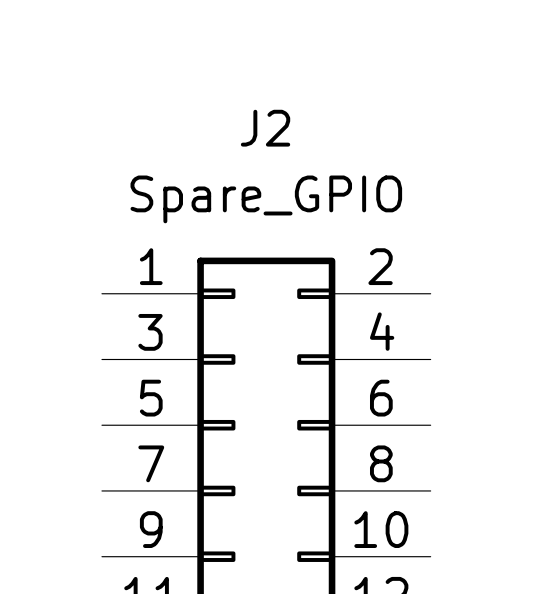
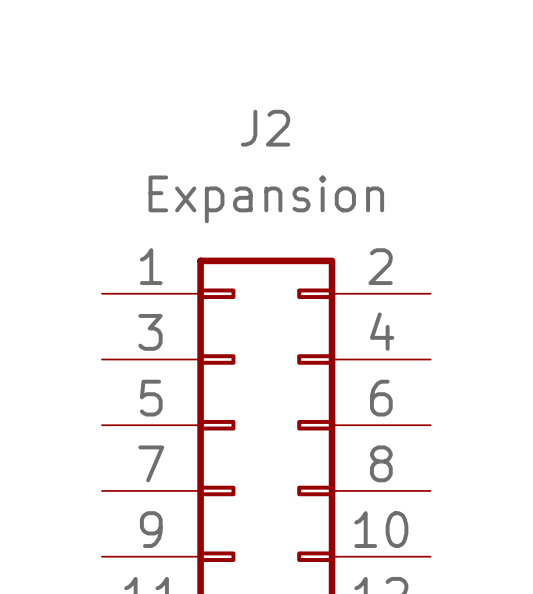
J2 value: Spare_GPIO (266, 199) -> Expansion (266, 199)

